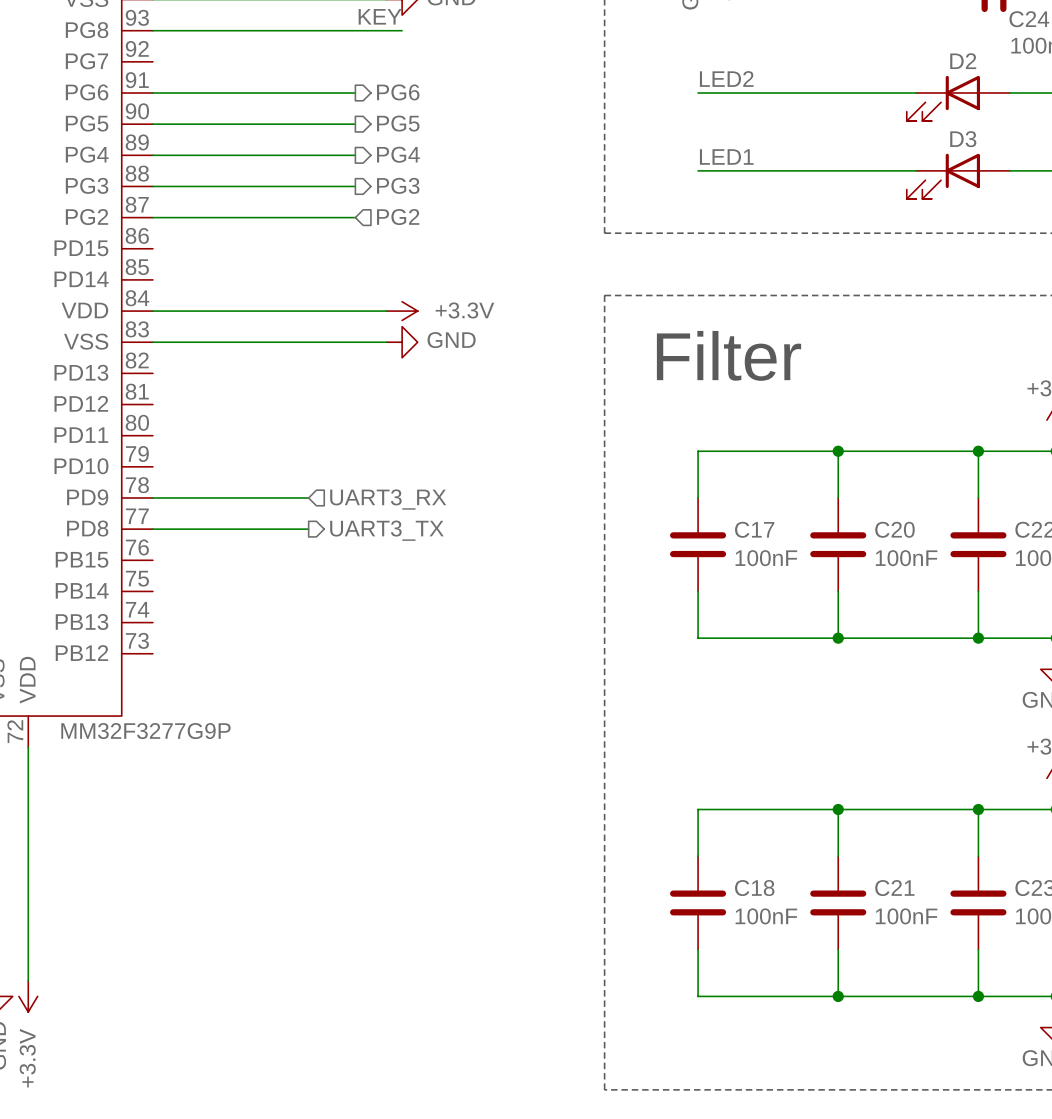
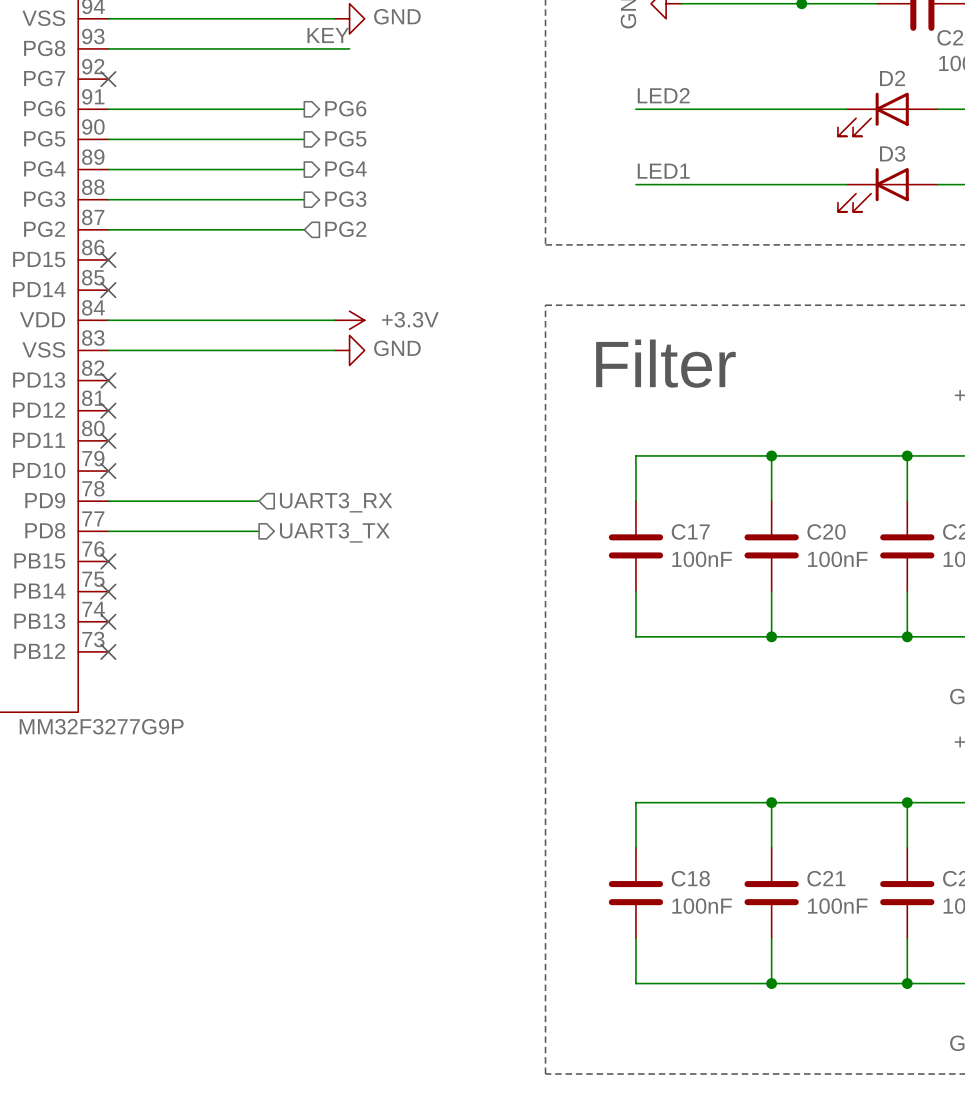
no-connect mark: none -> (108, 79)
no-connect mark: none -> (108, 259)
no-connect mark: none -> (108, 290)
no-connect mark: none -> (108, 380)
no-connect mark: none -> (108, 410)
no-connect mark: none -> (108, 440)
no-connect mark: none -> (108, 471)
no-connect mark: none -> (108, 561)
no-connect mark: none -> (108, 591)
no-connect mark: none -> (108, 621)
no-connect mark: none -> (108, 651)

